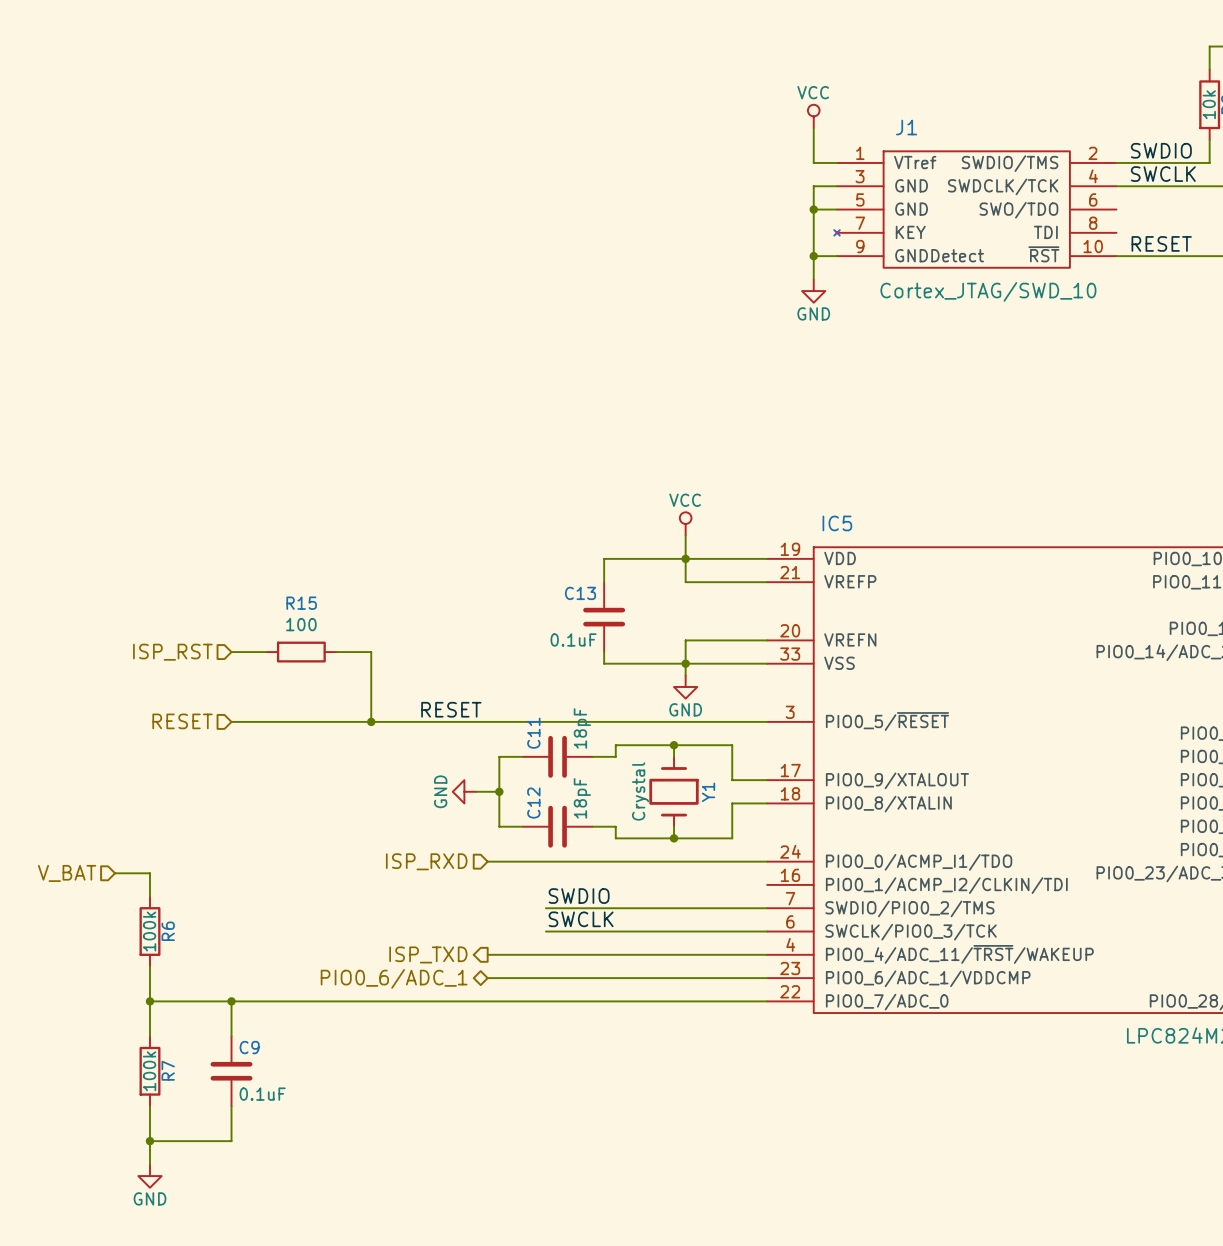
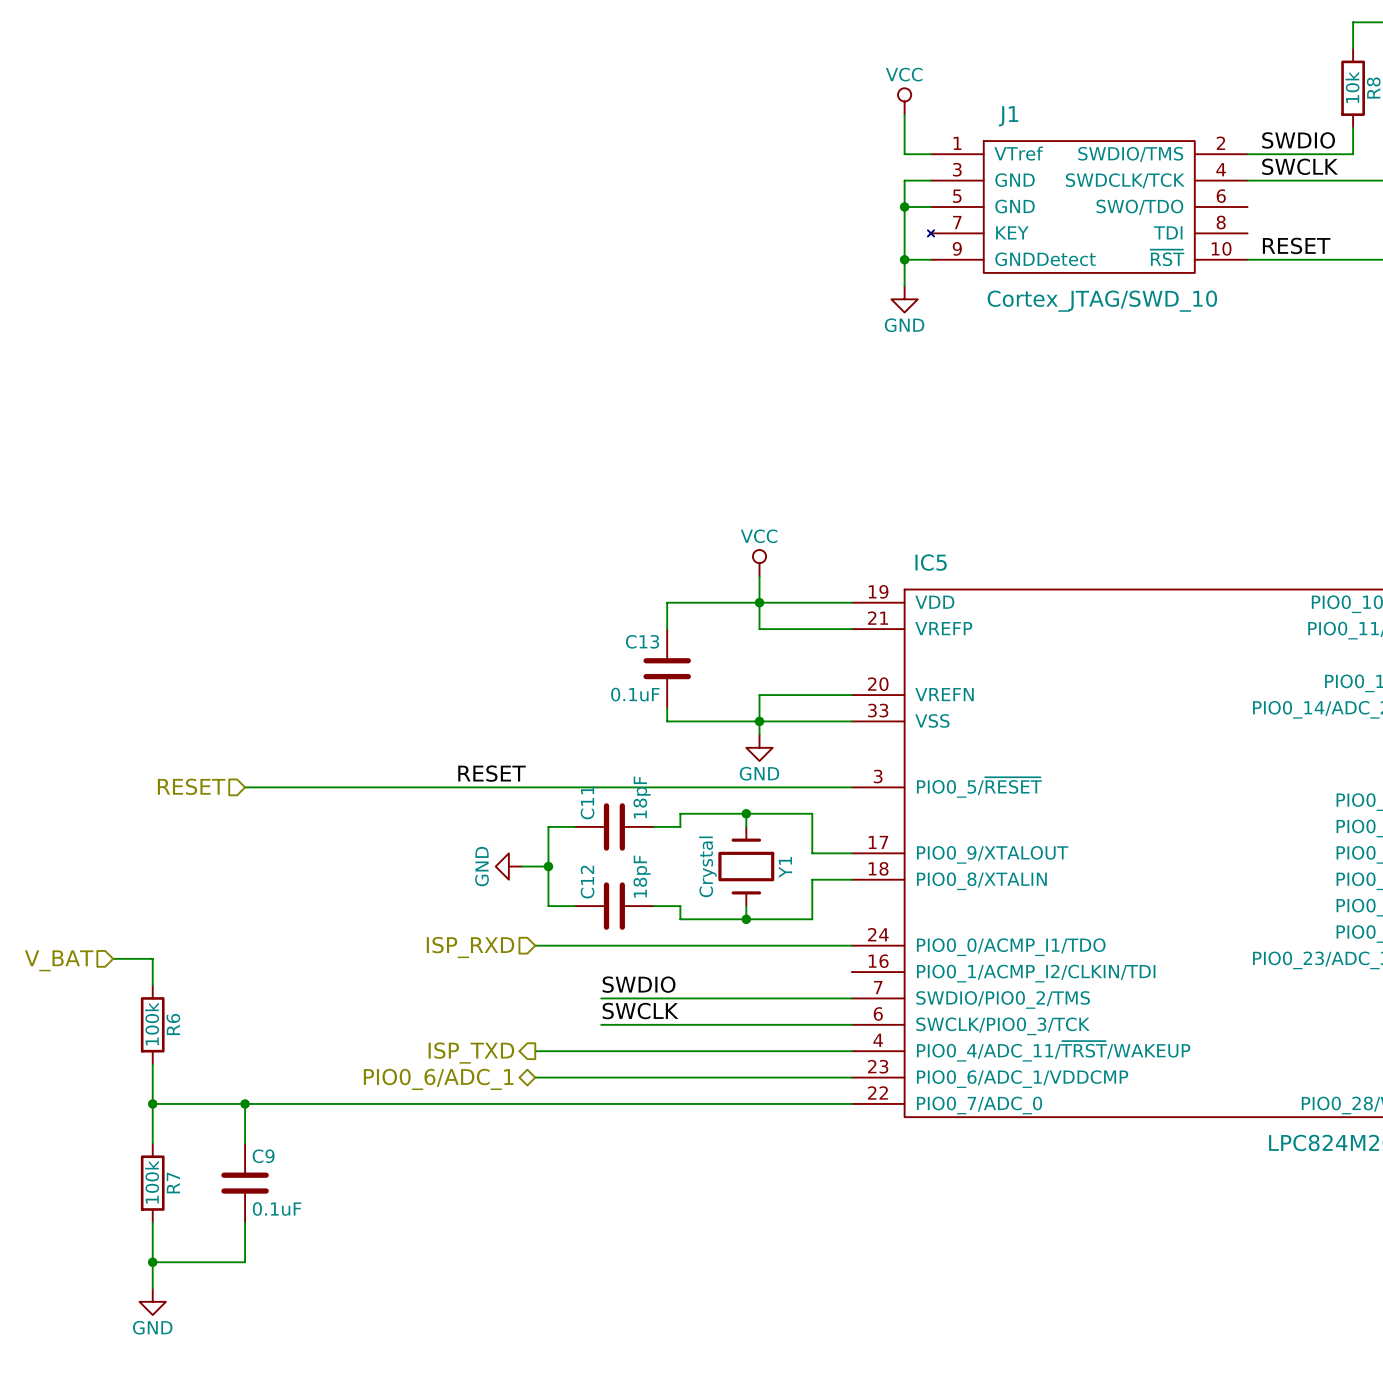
hierarchical label: ISP_RST (172, 652) -> none
wire: (231, 652) (266, 652) -> none
R15: 100 (301, 652) -> none
wire: (336, 652) (371, 652) (371, 721) -> none
junction: (371, 721) -> none

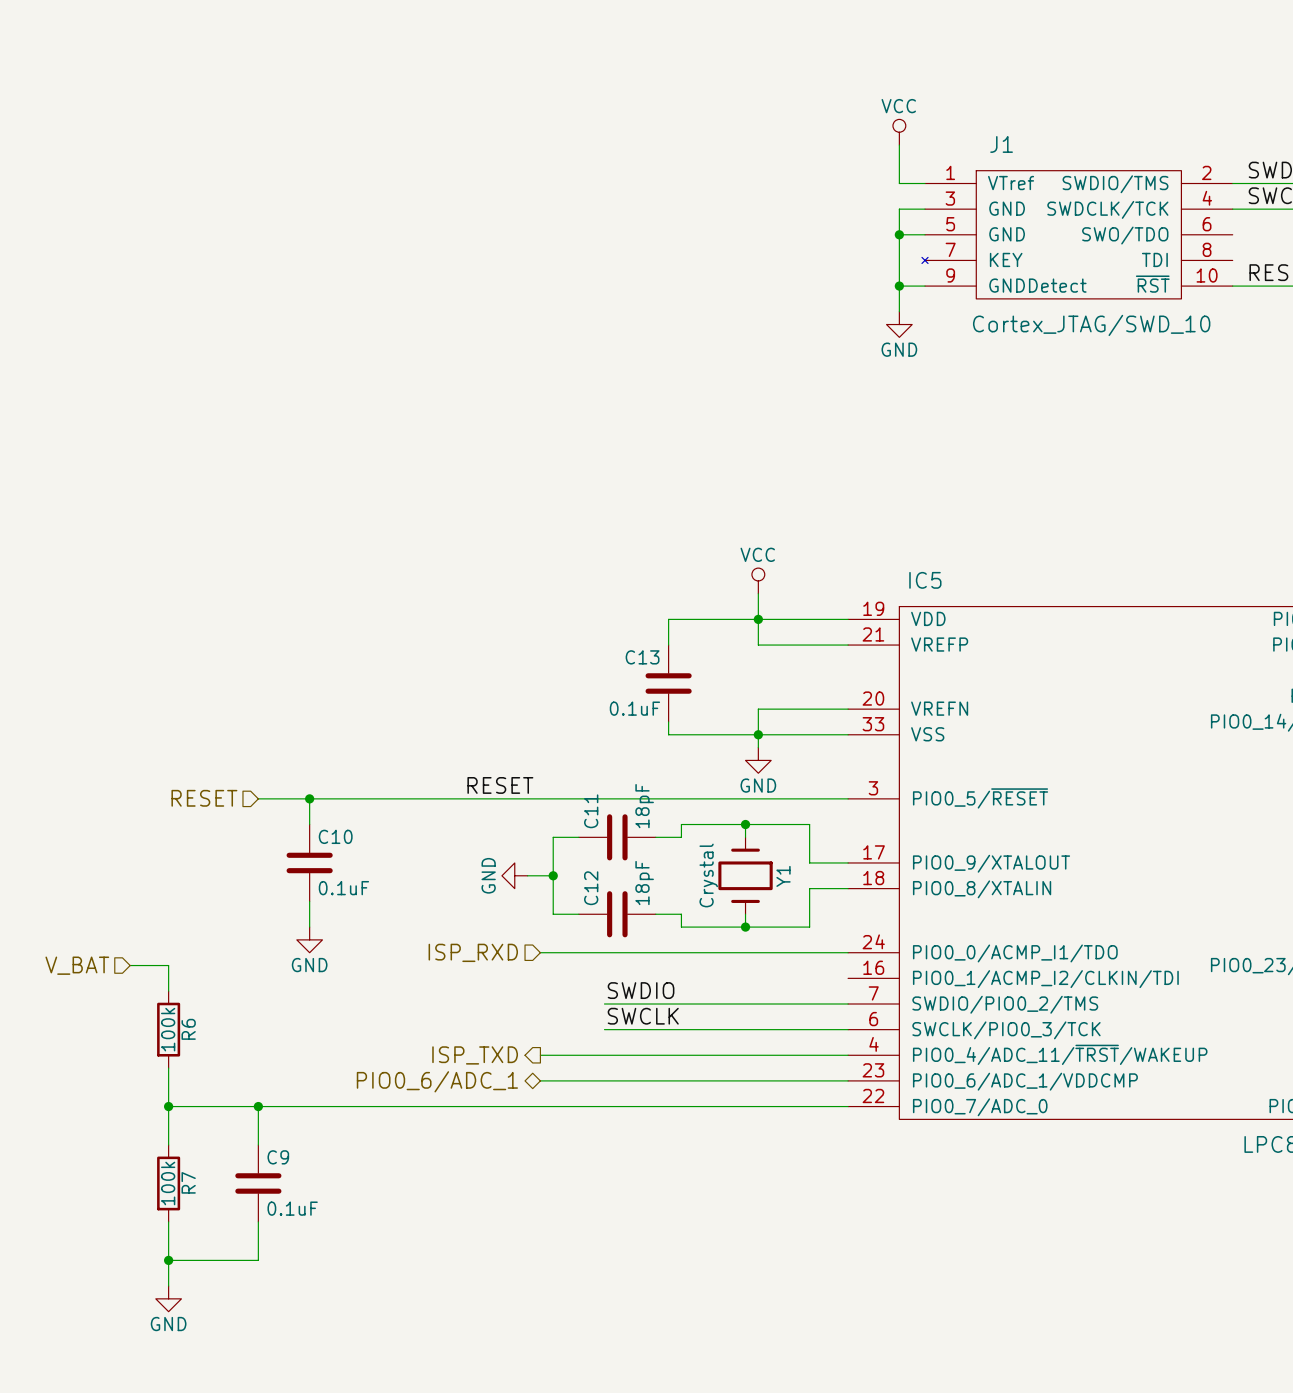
wire: none -> (309, 798) (309, 824)
junction: none -> (309, 798)
C10: none -> 0.1uF (309, 862)
wire: none -> (309, 901) (309, 927)
power symbol: none -> GND (309, 939)

